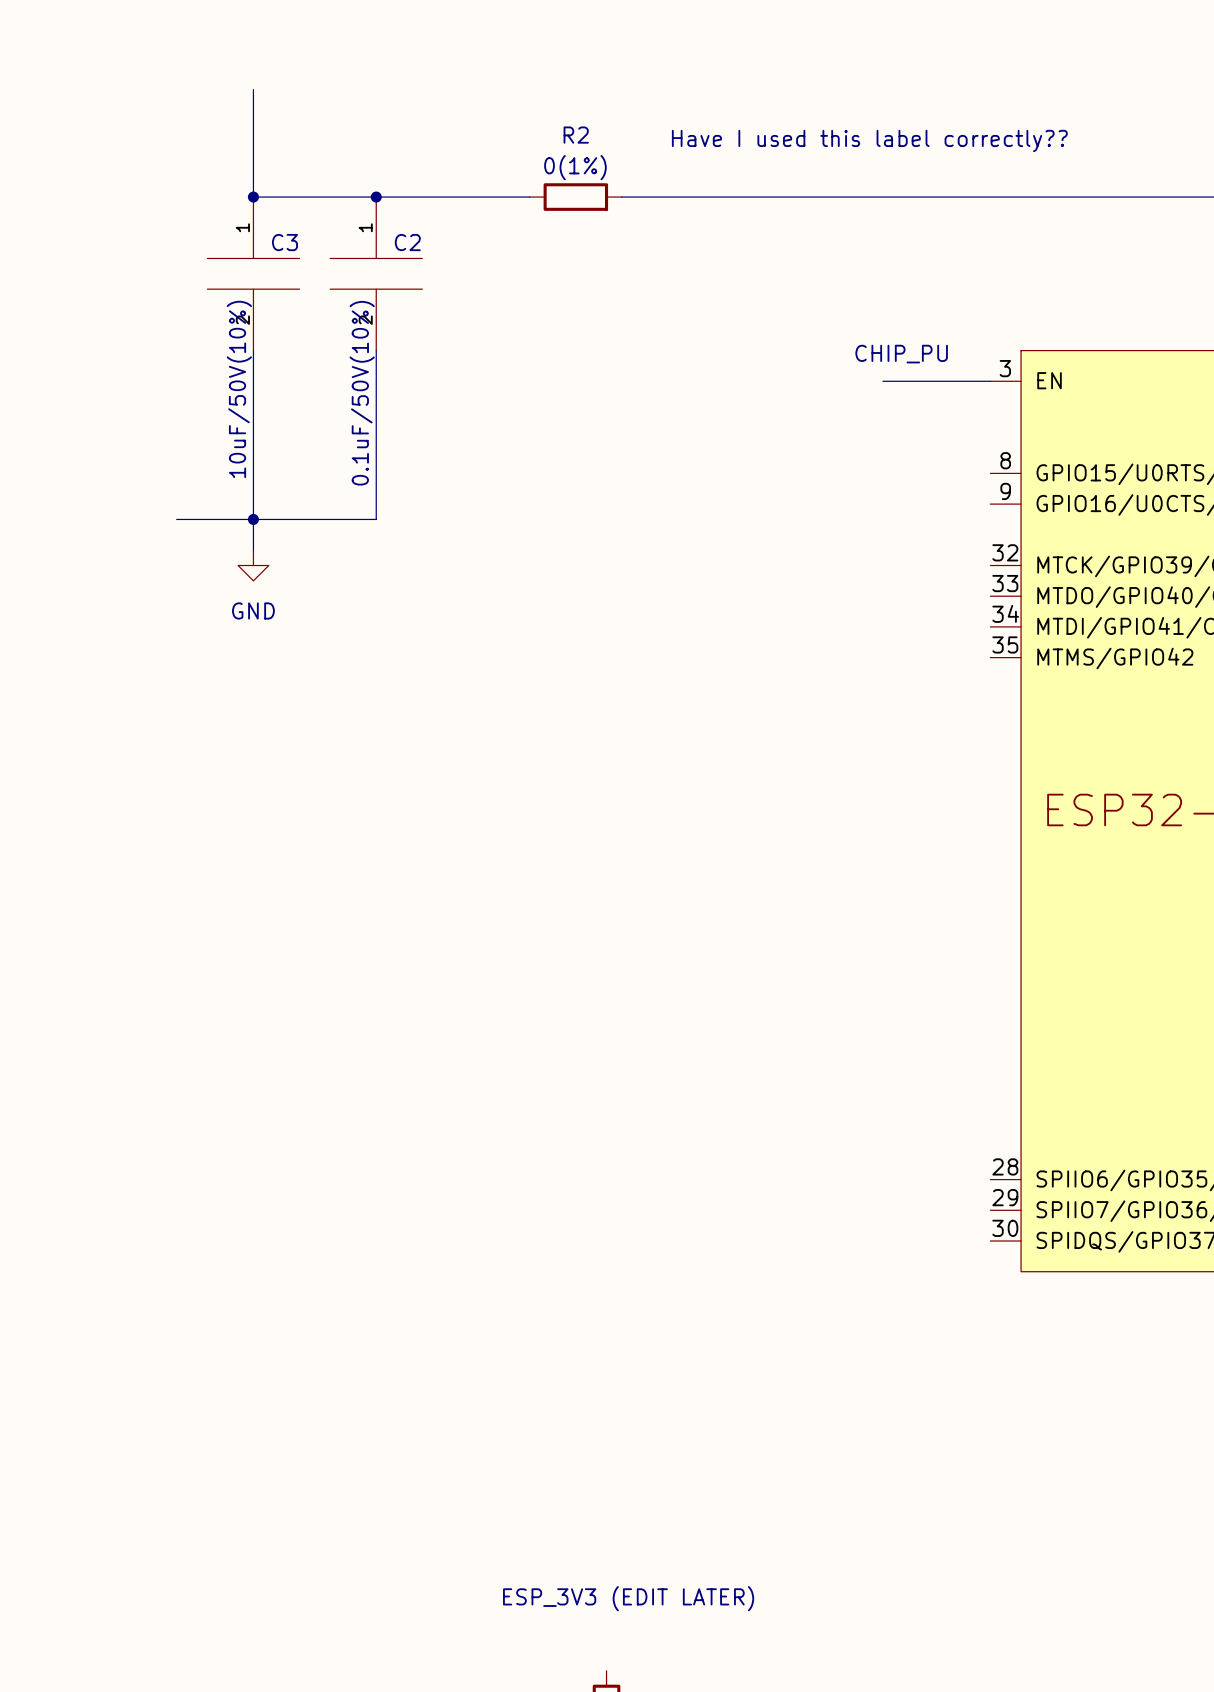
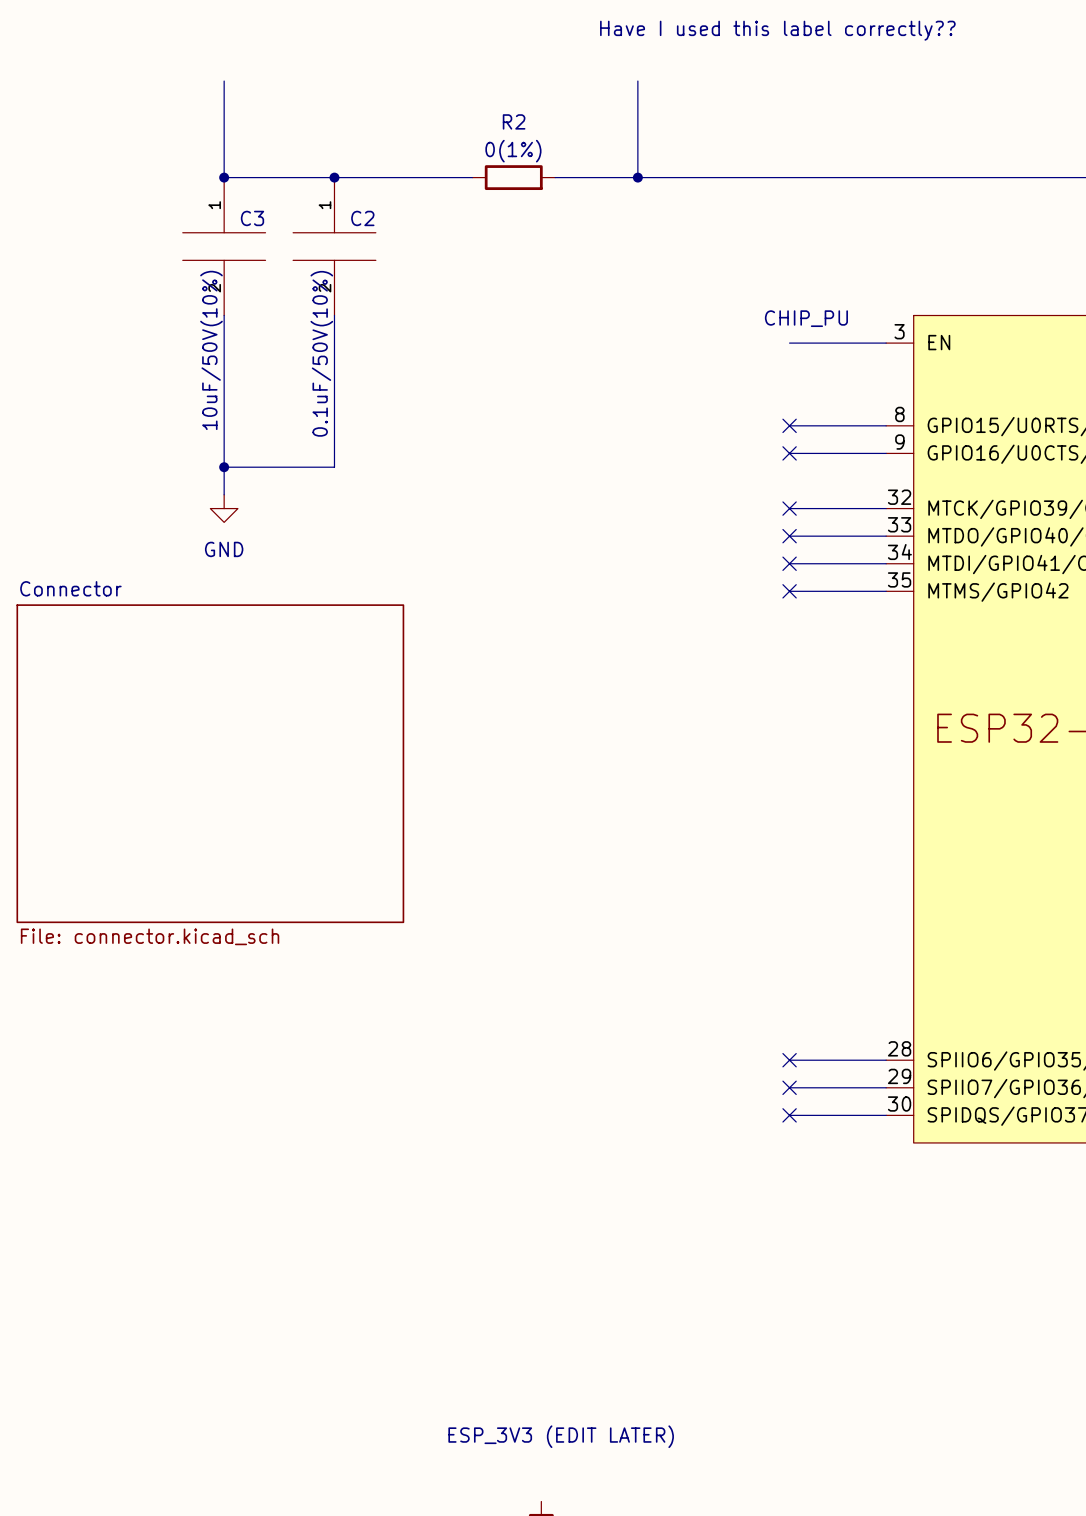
wire: none -> (637, 81) (637, 177)
text position: Have I used this label correctly?? (869, 140) -> Have I used this label correctly?? (777, 30)
junction: none -> (637, 177)
wire: none -> (789, 425) (886, 425)
no-connect mark: none -> (789, 425)
wire: none -> (789, 453) (886, 453)
no-connect mark: none -> (789, 453)
wire: (176, 519) (253, 519) -> none
wire: none -> (789, 508) (886, 508)
no-connect mark: none -> (789, 508)
wire: none -> (789, 536) (886, 536)
no-connect mark: none -> (789, 536)
wire: none -> (789, 563) (886, 563)
no-connect mark: none -> (789, 563)
wire: none -> (789, 591) (886, 591)
no-connect mark: none -> (789, 591)
sheet Connector: none -> File: connector.kicad_sch (210, 763)
wire: none -> (789, 1060) (886, 1060)
no-connect mark: none -> (789, 1060)
wire: none -> (789, 1087) (886, 1087)
no-connect mark: none -> (789, 1087)
wire: none -> (789, 1115) (886, 1115)
no-connect mark: none -> (789, 1115)

